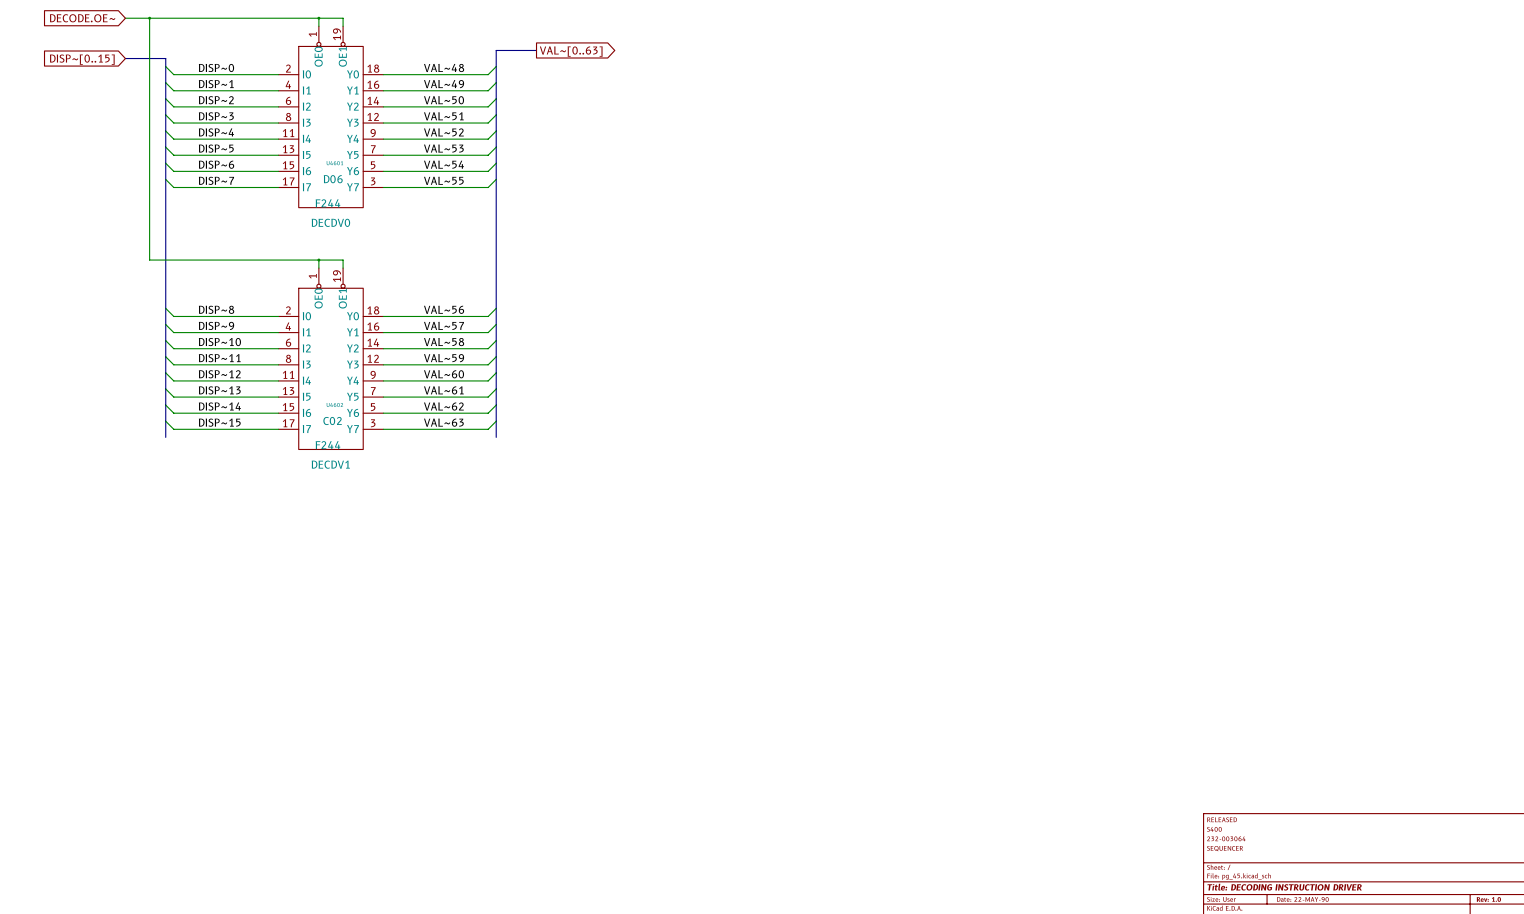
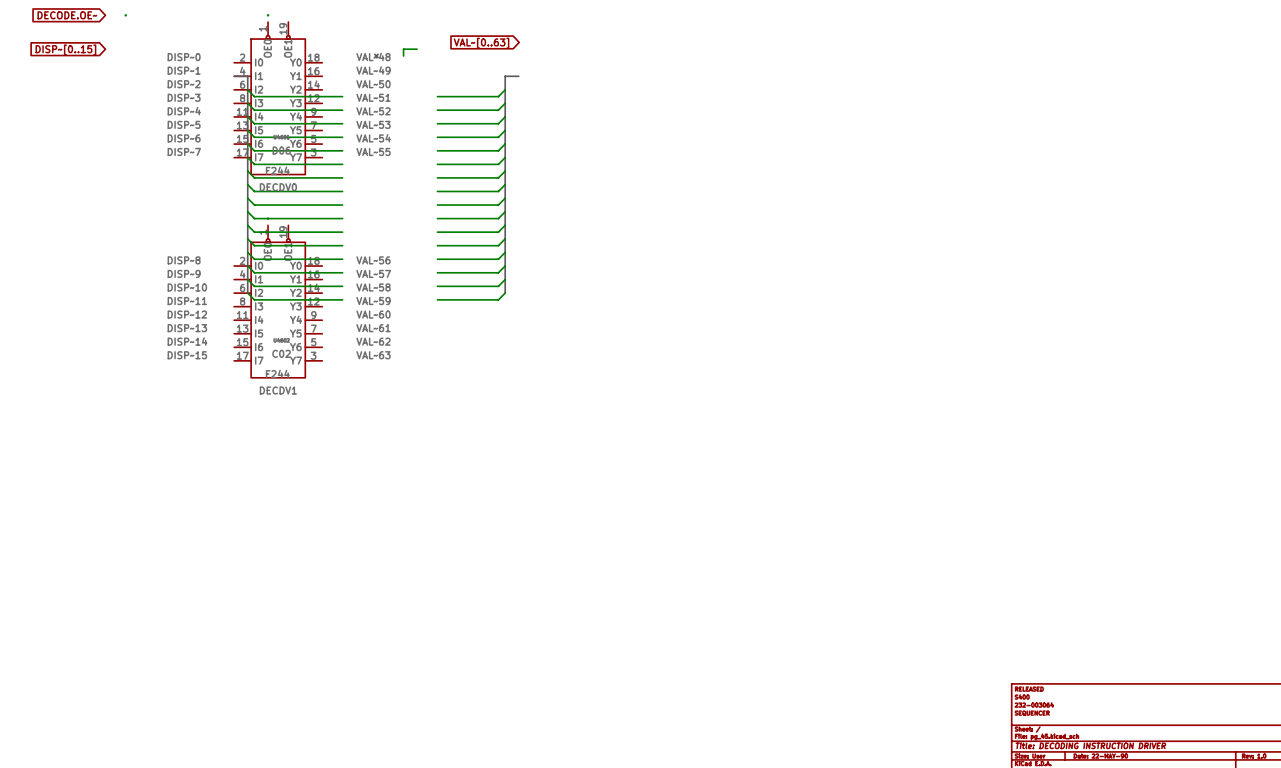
wire: (125, 18) (343, 18) (343, 26) -> none
wire: (149, 18) (149, 260) (302, 260) -> (247, 211) (254, 218)
wire: (318, 18) (318, 26) -> none
bus: (536, 50) (496, 50) (496, 437) -> none
bus: (125, 58) (165, 58) (165, 437) -> none
wire: none -> (417, 49) (403, 49) (403, 55)
wire: (165, 66) (173, 74) (278, 74) -> none
no-connect mark: none -> (376, 55)
wire: (496, 66) (488, 74) (383, 74) -> none
wire: (165, 82) (173, 90) (278, 90) -> none
wire: (496, 82) (488, 90) (383, 90) -> none
bus: none -> (234, 76) (247, 76) (247, 293)
bus: none -> (518, 76) (505, 76) (505, 293)
wire: (165, 98) (173, 106) (278, 106) -> none
wire: (496, 98) (488, 106) (383, 106) -> none
wire: none -> (247, 89) (254, 96) (342, 96)
wire: none -> (505, 89) (498, 96) (437, 96)
wire: (165, 114) (173, 123) (278, 123) -> none
wire: (496, 114) (488, 123) (383, 123) -> none
wire: none -> (247, 103) (254, 110) (342, 110)
wire: none -> (505, 103) (498, 110) (437, 110)
wire: (165, 131) (173, 139) (278, 139) -> none
wire: (496, 131) (488, 139) (383, 139) -> none
wire: none -> (247, 116) (254, 123) (342, 123)
wire: none -> (505, 116) (498, 123) (437, 123)
wire: (165, 147) (173, 155) (278, 155) -> none
wire: (496, 147) (488, 155) (383, 155) -> none
wire: none -> (247, 130) (254, 137) (342, 137)
wire: none -> (505, 130) (498, 137) (437, 137)
wire: (165, 163) (173, 171) (278, 171) -> none
wire: (496, 163) (488, 171) (383, 171) -> none
wire: none -> (247, 144) (254, 150) (342, 150)
wire: none -> (505, 144) (498, 150) (437, 150)
wire: (165, 179) (173, 187) (278, 187) -> none
wire: (496, 179) (488, 187) (383, 187) -> none
wire: none -> (247, 157) (254, 164) (342, 164)
wire: none -> (505, 157) (498, 164) (437, 164)
wire: none -> (247, 171) (254, 177) (342, 177)
wire: none -> (505, 171) (498, 177) (437, 177)
wire: none -> (247, 184) (254, 191) (342, 191)
wire: none -> (505, 184) (498, 191) (437, 191)
wire: none -> (247, 198) (254, 205) (342, 205)
wire: none -> (505, 198) (498, 205) (437, 205)
wire: none -> (505, 211) (498, 218) (437, 218)
wire: (318, 260) (318, 268) -> none
wire: (343, 260) (343, 268) -> (288, 218) (342, 218)
wire: none -> (247, 225) (254, 232) (342, 232)
wire: none -> (505, 225) (498, 232) (437, 232)
wire: none -> (247, 238) (254, 245) (342, 245)
wire: none -> (505, 238) (498, 245) (437, 245)
wire: none -> (247, 252) (254, 259) (342, 259)
wire: none -> (505, 252) (498, 259) (437, 259)
wire: (165, 308) (173, 316) (278, 316) -> none
wire: (496, 308) (488, 316) (383, 316) -> none
wire: none -> (247, 266) (254, 272) (342, 272)
wire: none -> (505, 266) (498, 272) (437, 272)
wire: (165, 324) (173, 332) (278, 332) -> none
wire: (496, 324) (488, 332) (383, 332) -> none
wire: none -> (247, 279) (254, 286) (342, 286)
wire: none -> (505, 279) (498, 286) (437, 286)
wire: (165, 340) (173, 348) (278, 348) -> none
wire: (496, 340) (488, 348) (383, 348) -> none
wire: none -> (247, 293) (254, 299) (342, 299)
wire: none -> (505, 293) (498, 299) (437, 299)
wire: (165, 356) (173, 364) (278, 364) -> none
wire: (496, 356) (488, 364) (383, 364) -> none
wire: (165, 372) (173, 380) (278, 380) -> none
wire: (496, 372) (488, 380) (383, 380) -> none
wire: (165, 389) (173, 397) (278, 397) -> none
wire: (496, 389) (488, 397) (383, 397) -> none
wire: (165, 405) (173, 413) (278, 413) -> none
wire: (496, 405) (488, 413) (383, 413) -> none
wire: (165, 421) (173, 429) (278, 429) -> none
wire: (496, 421) (488, 429) (383, 429) -> none

